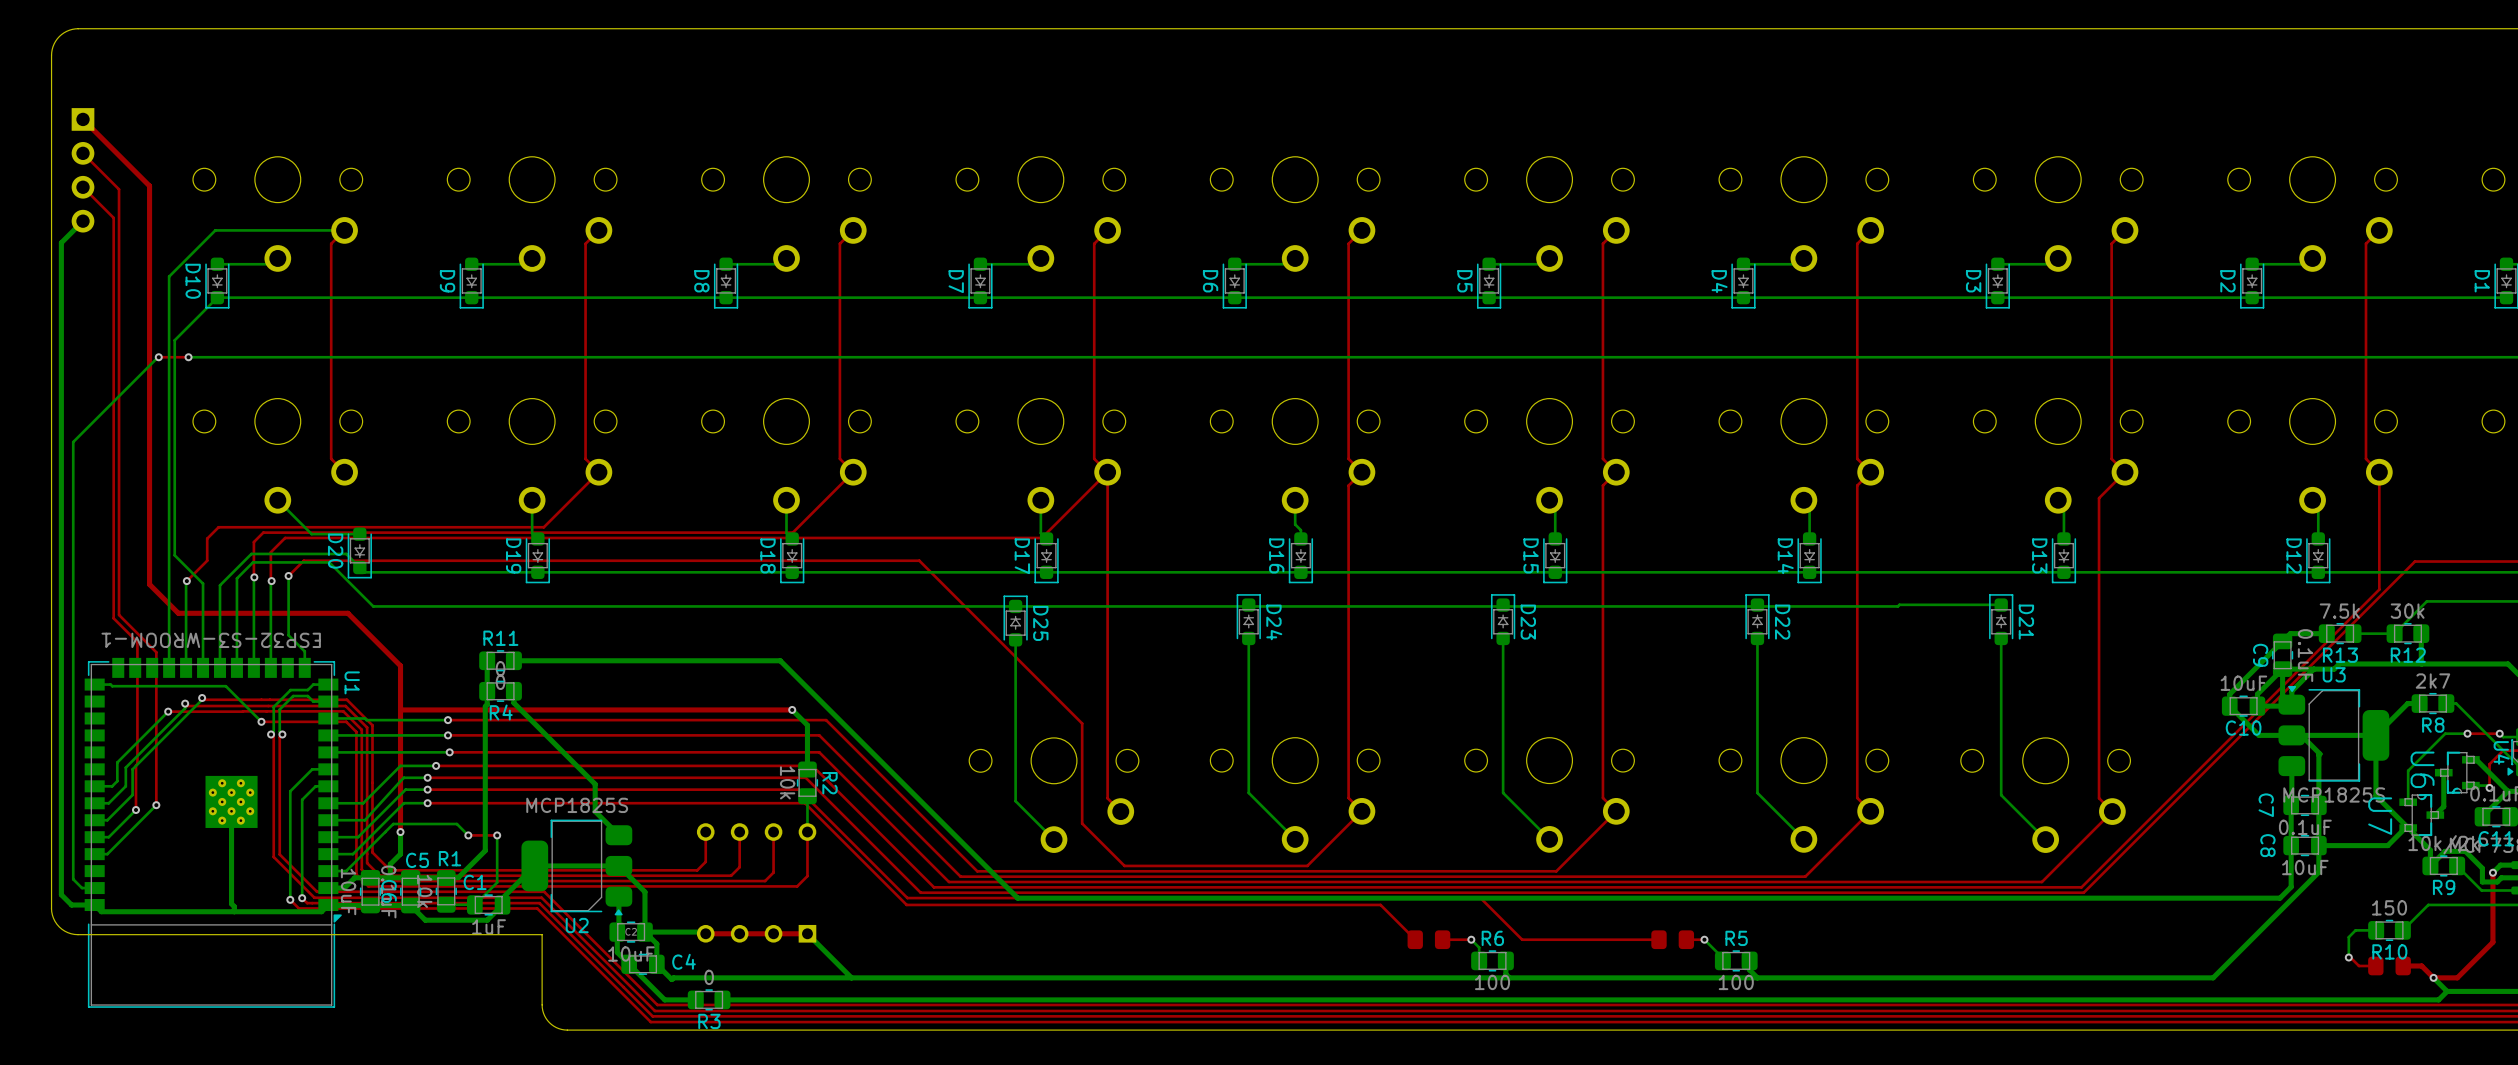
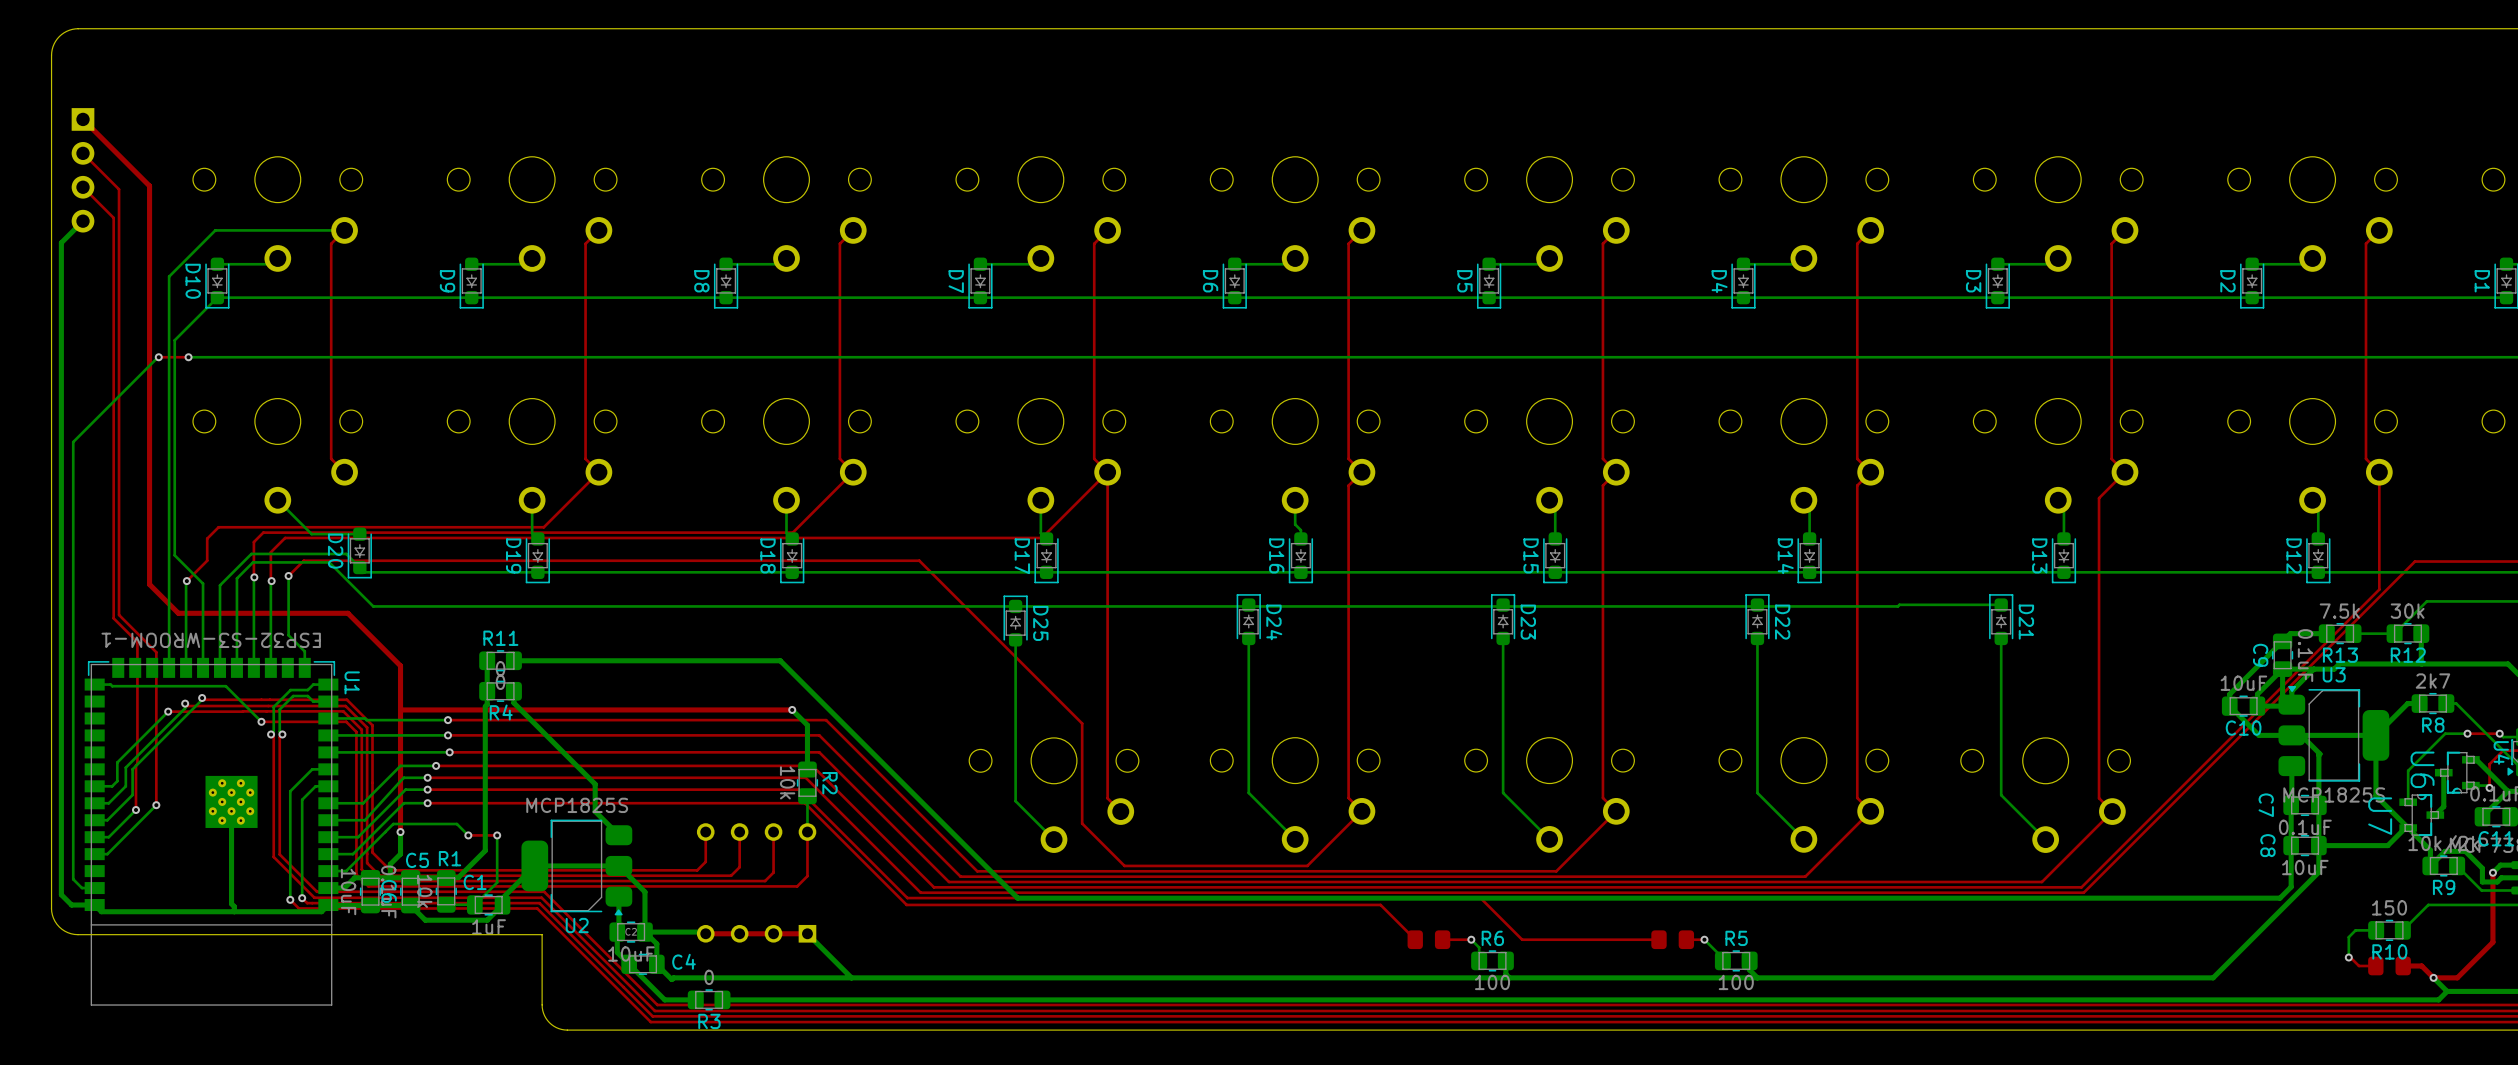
U1 footprint: [84, 657, 342, 1008] -> [84, 657, 339, 1006]

